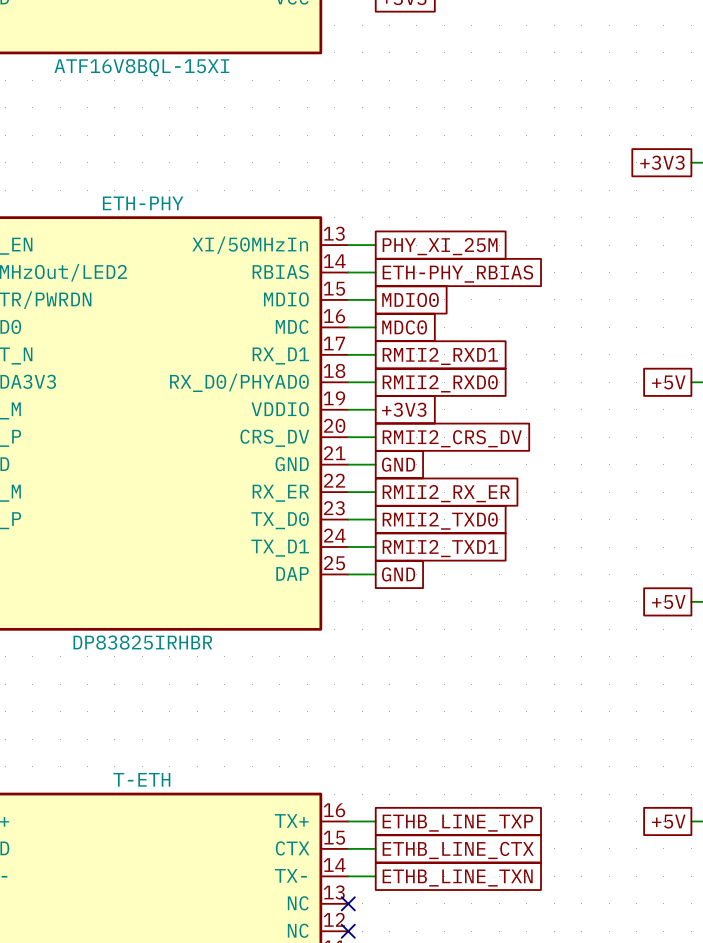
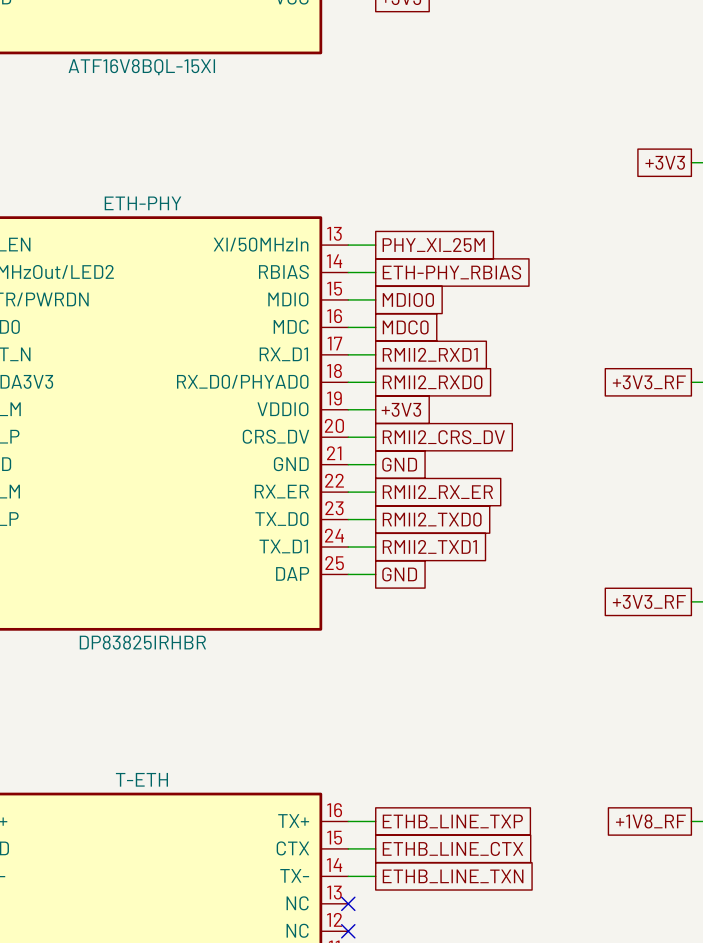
global label: +5V (668, 382) -> +3V3_RF (649, 382)
global label: +5V (668, 602) -> +3V3_RF (649, 601)
global label: +5V (668, 821) -> +1V8_RF (650, 821)

